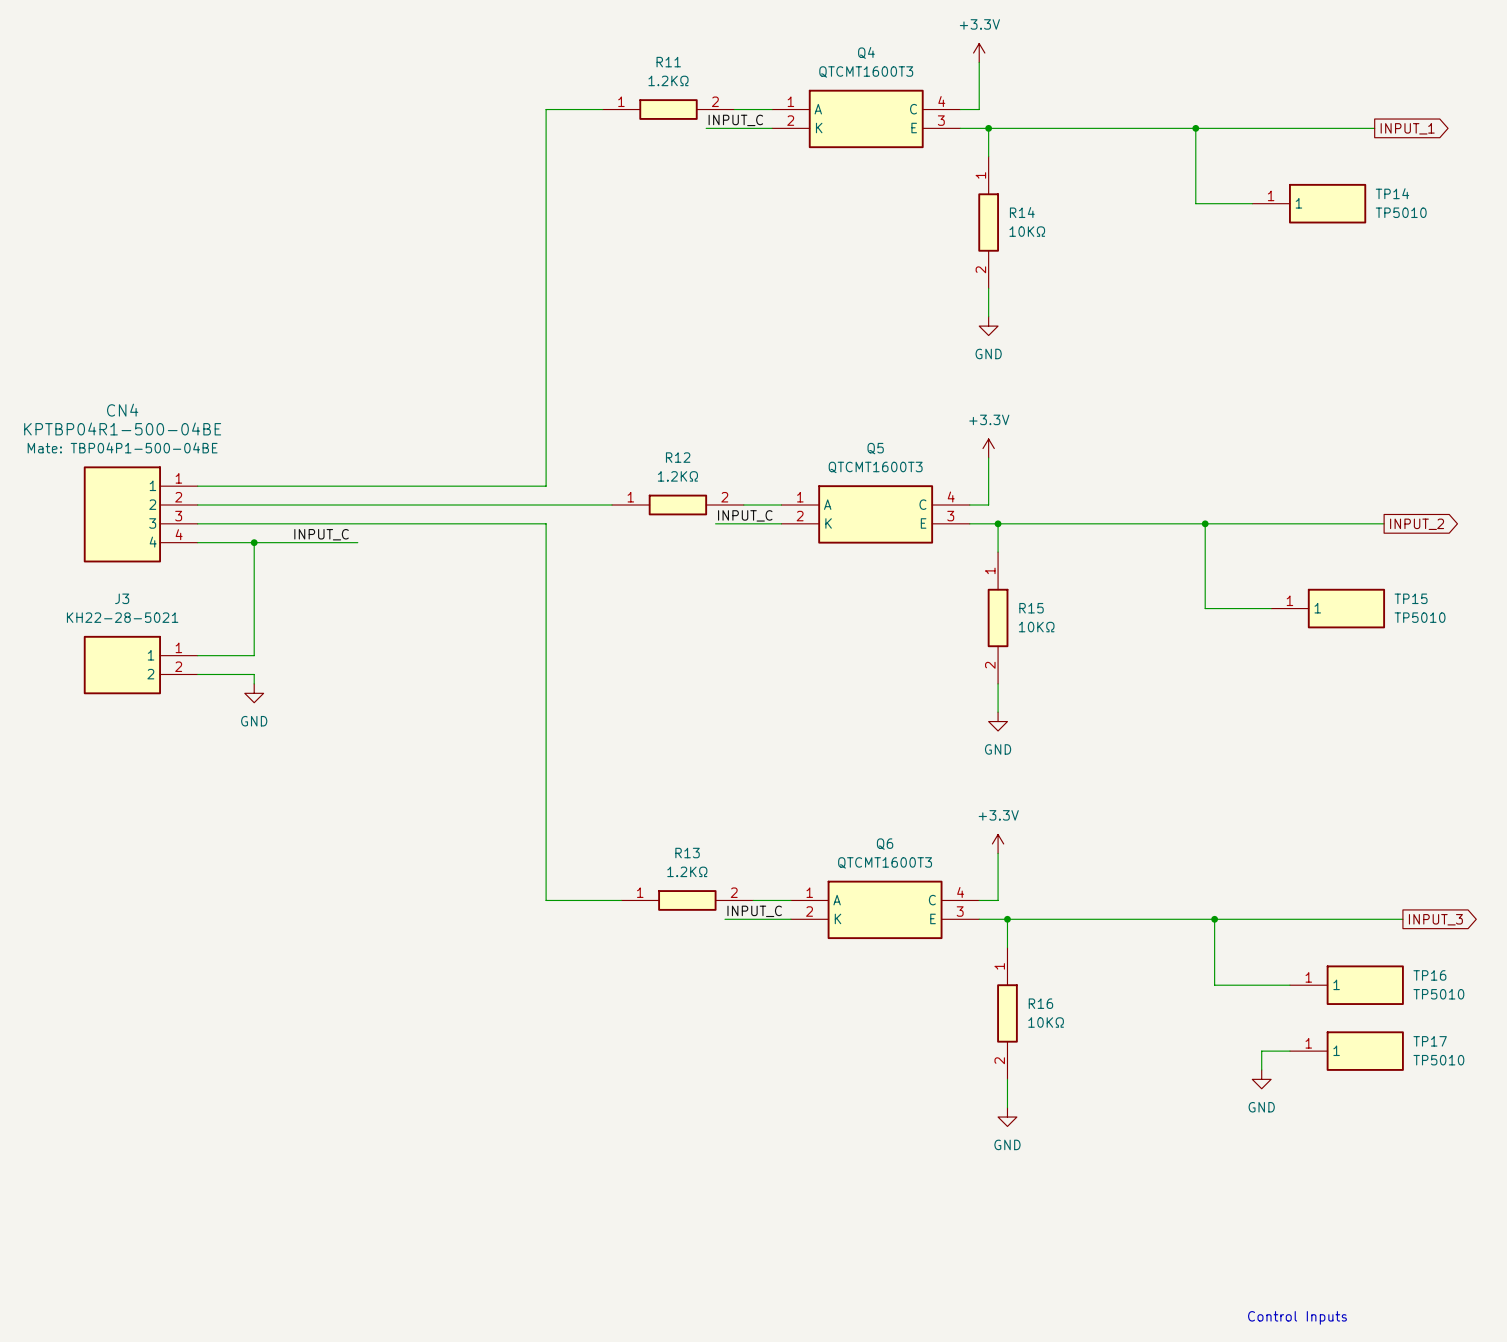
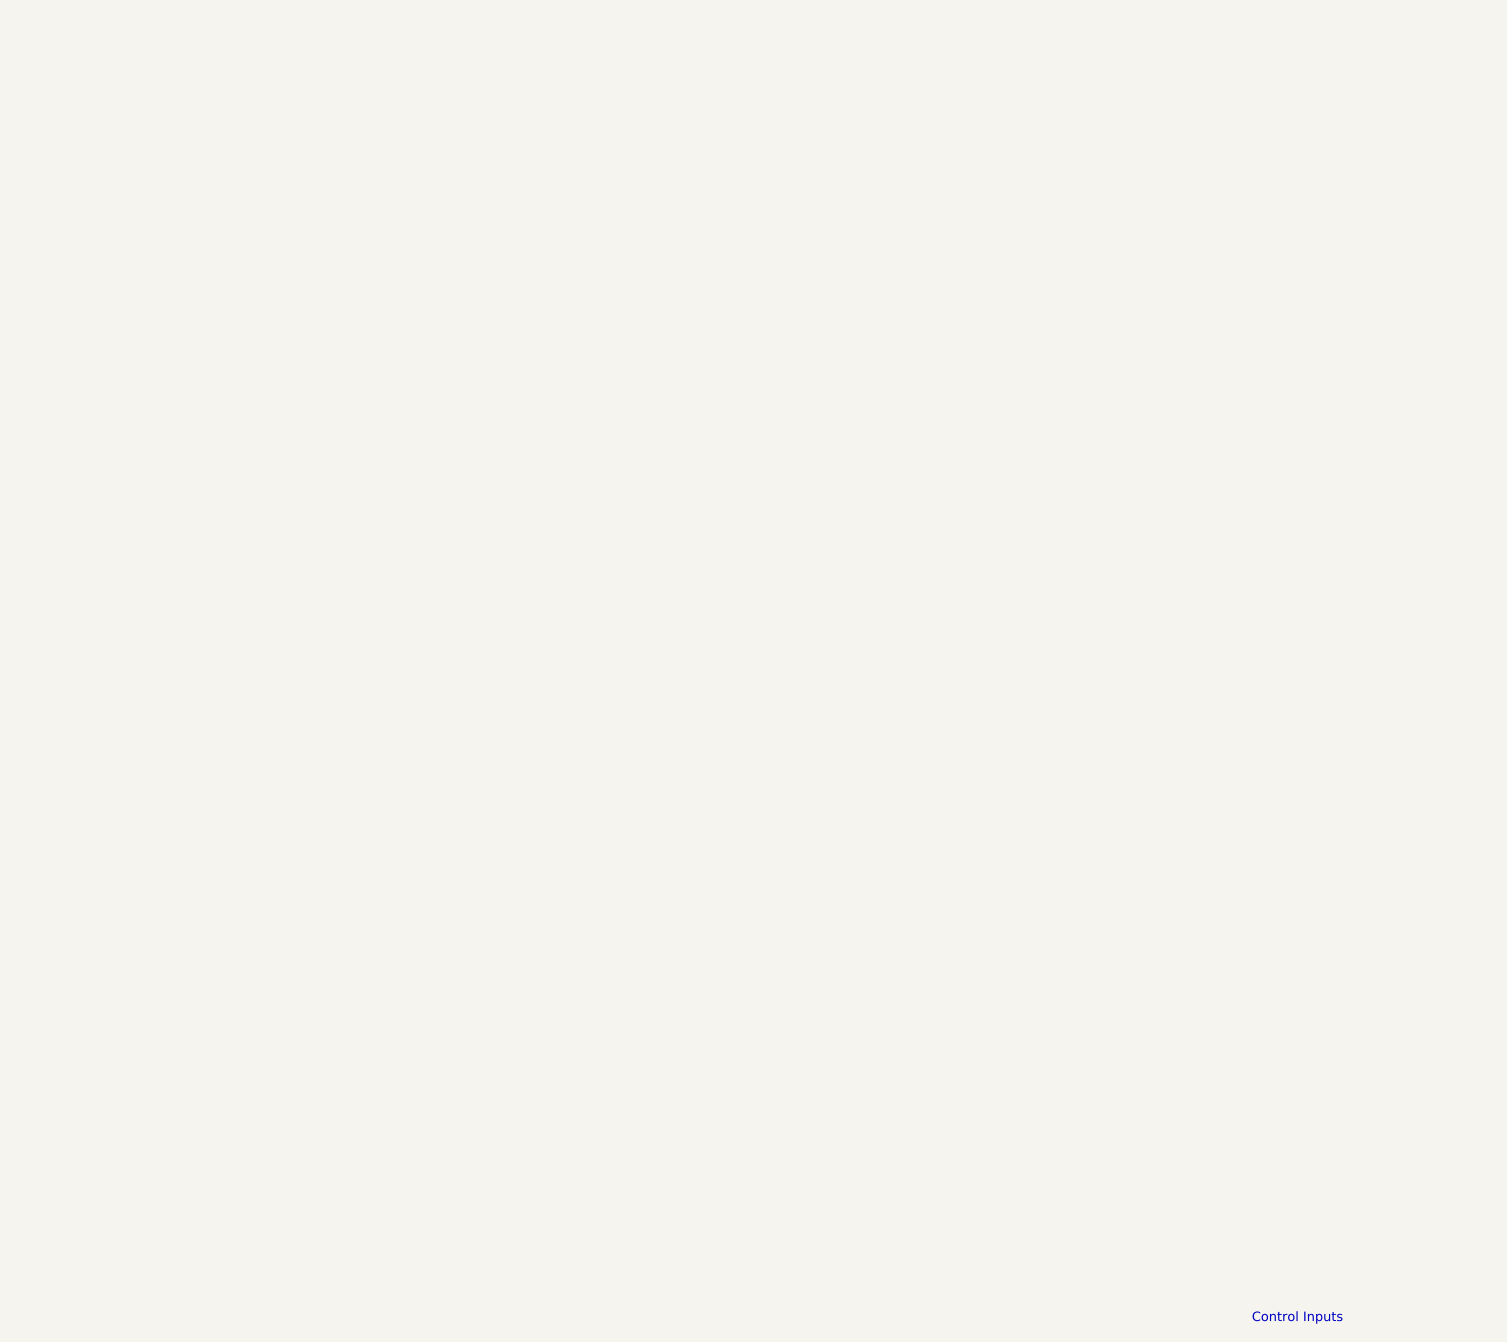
power symbol: +3.3V (979, 53) -> none
wire: (979, 62) (979, 109) (960, 109) -> none
wire: (602, 109) (546, 109) (546, 486) (197, 486) -> none
R11: (668, 109) -> none
wire: (734, 109) (772, 109) -> none
Q4: QTCMT1600T3 (866, 118) -> none
label: INPUT_C (735, 120) -> none
wire: (706, 128) (772, 128) -> none
wire: (960, 128) (1374, 128) -> none
wire: (988, 128) (988, 156) -> none
junction: (988, 128) -> none
wire: (1195, 128) (1195, 203) (1252, 203) -> none
junction: (1195, 128) -> none
global label: INPUT_1 (1407, 128) -> none
TP14: TP5010 (1309, 203) -> none
R14: (988, 222) -> none
wire: (988, 288) (988, 316) -> none
power symbol: GND (988, 326) -> none
power symbol: +3.3V (988, 448) -> none
wire: (988, 457) (988, 505) (969, 505) -> none
wire: (197, 505) (612, 505) -> none
R12: (677, 505) -> none
wire: (743, 505) (781, 505) -> none
CN4: KPTBP04R1-500-04BE (140, 514) -> none
Q5: QTCMT1600T3 (875, 514) -> none
label: INPUT_C (745, 515) -> none
wire: (197, 523) (546, 523) (546, 900) (621, 900) -> none
wire: (715, 523) (781, 523) -> none
wire: (969, 523) (1384, 523) -> none
wire: (998, 523) (998, 552) -> none
junction: (998, 523) -> none
wire: (1205, 523) (1205, 608) (1271, 608) -> none
junction: (1205, 523) -> none
global label: INPUT_2 (1417, 524) -> none
label: INPUT_C (321, 534) -> none
wire: (197, 542) (357, 542) -> none
wire: (254, 542) (254, 655) (197, 655) -> none
junction: (254, 542) -> none
TP15: TP5010 (1328, 608) -> none
R15: (998, 617) -> none
J3: KH22-28-5021 (140, 665) -> none
wire: (197, 674) (254, 674) (254, 683) -> none
wire: (998, 683) (998, 712) -> none
power symbol: GND (254, 693) -> none
power symbol: GND (998, 721) -> none
power symbol: +3.3V (998, 843) -> none
wire: (998, 853) (998, 900) (979, 900) -> none
R13: (687, 900) -> none
wire: (753, 900) (790, 900) -> none
Q6: QTCMT1600T3 (885, 909) -> none
label: INPUT_C (754, 911) -> none
wire: (725, 919) (790, 919) -> none
wire: (979, 919) (1402, 919) -> none
wire: (1007, 919) (1007, 947) -> none
junction: (1007, 919) -> none
wire: (1214, 919) (1214, 985) (1289, 985) -> none
junction: (1214, 919) -> none
global label: INPUT_3 (1435, 919) -> none
TP16: TP5010 (1346, 985) -> none
R16: (1007, 1013) -> none
wire: (1289, 1051) (1261, 1051) (1261, 1069) -> none
TP17: TP5010 (1346, 1051) -> none
wire: (1007, 1079) (1007, 1107) -> none
power symbol: GND (1261, 1079) -> none
power symbol: GND (1007, 1117) -> none

